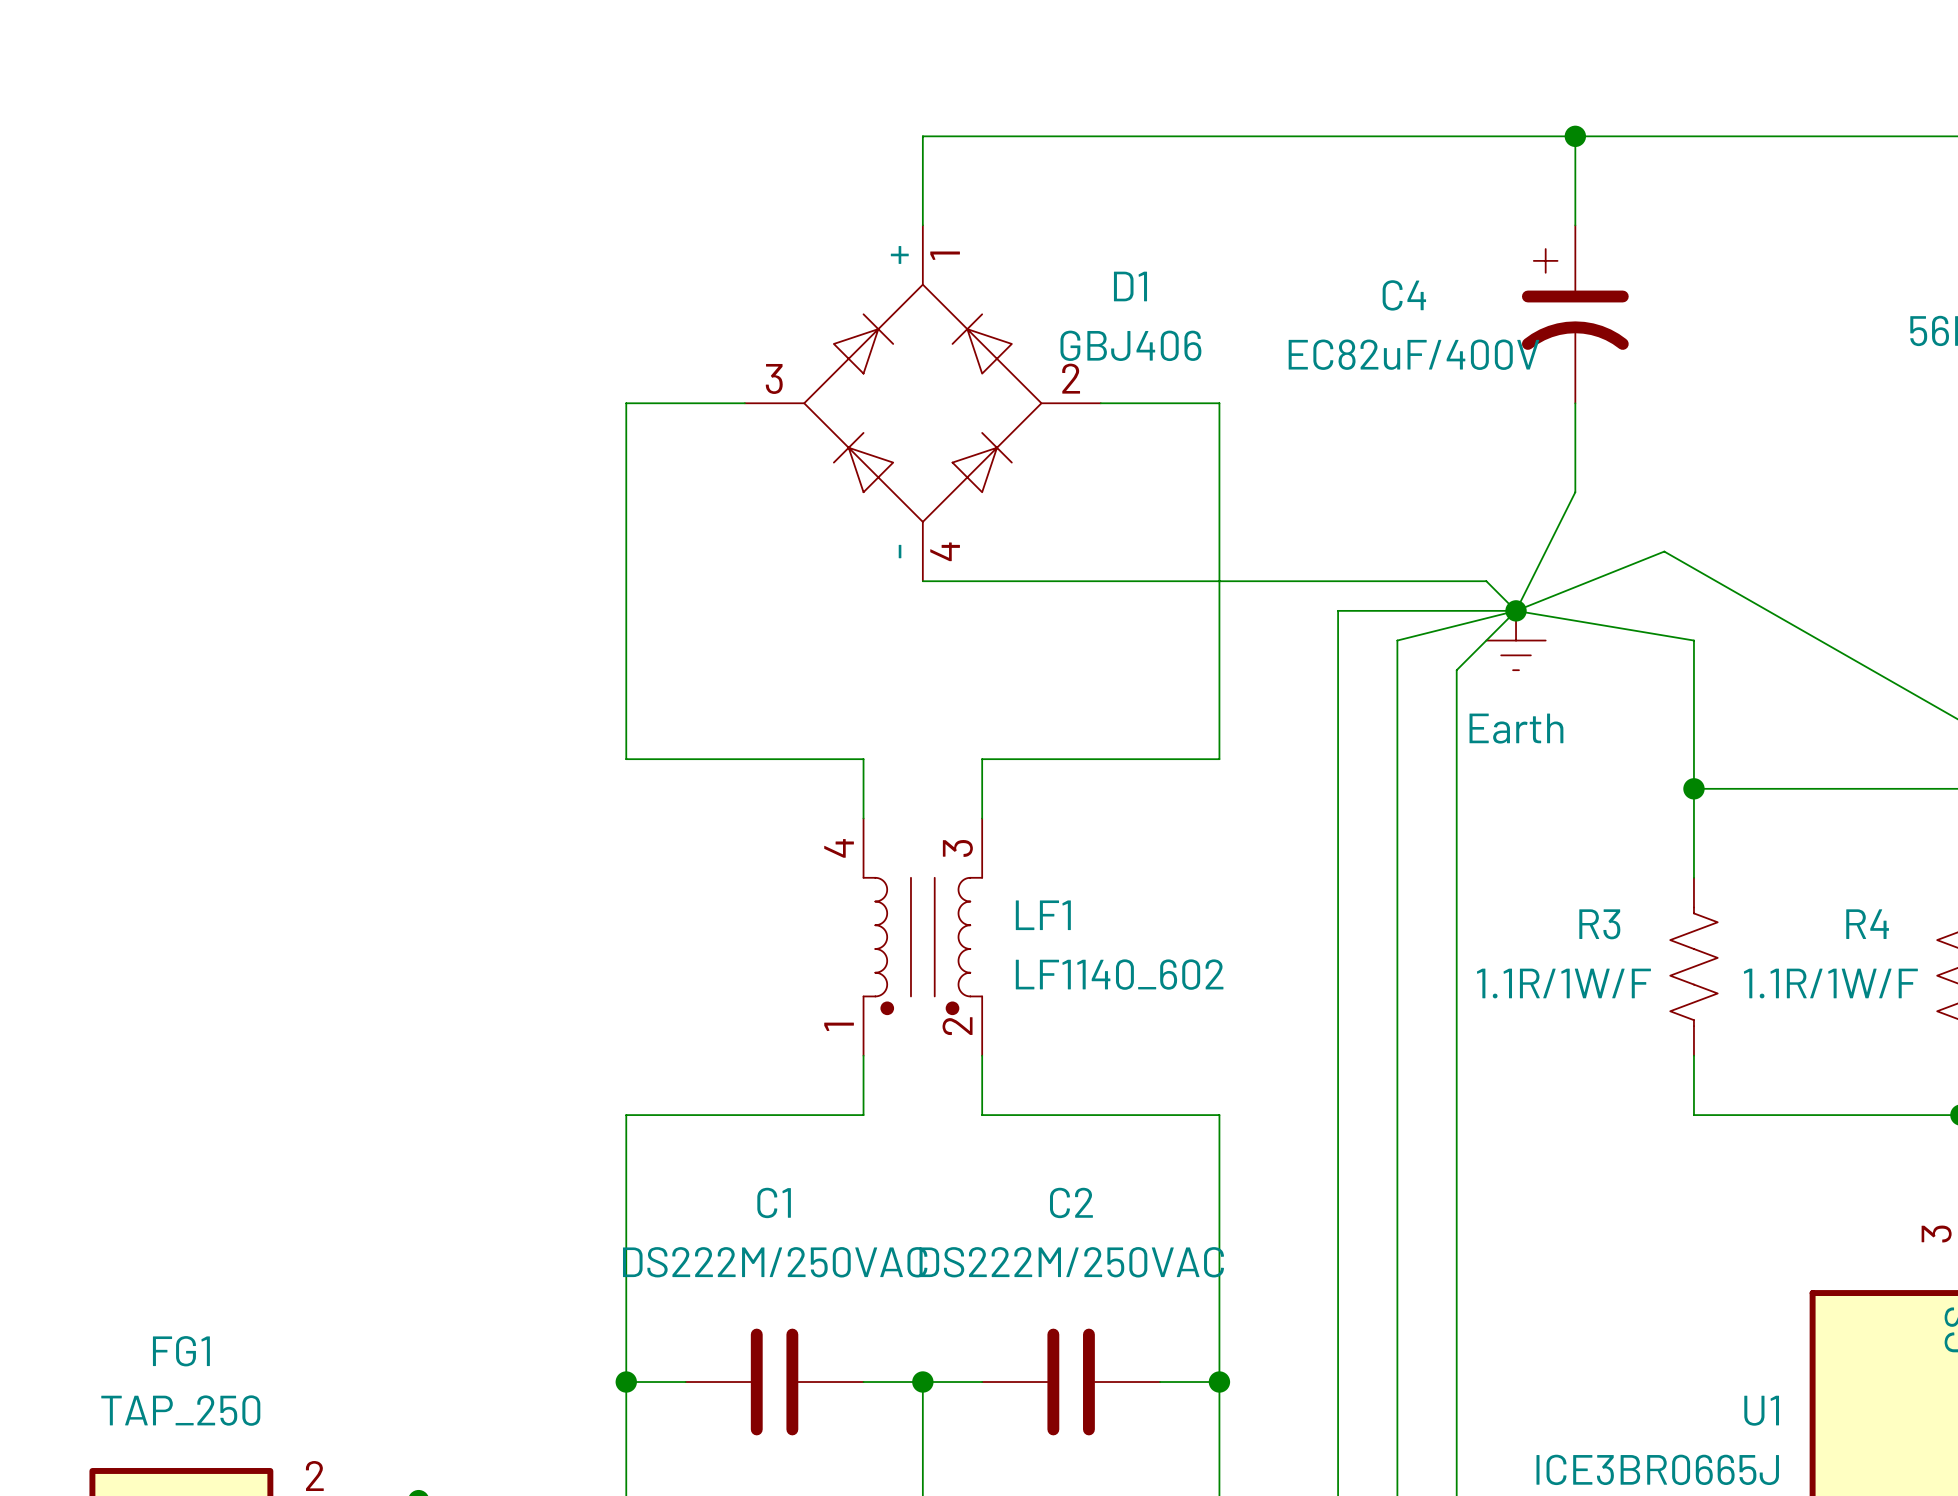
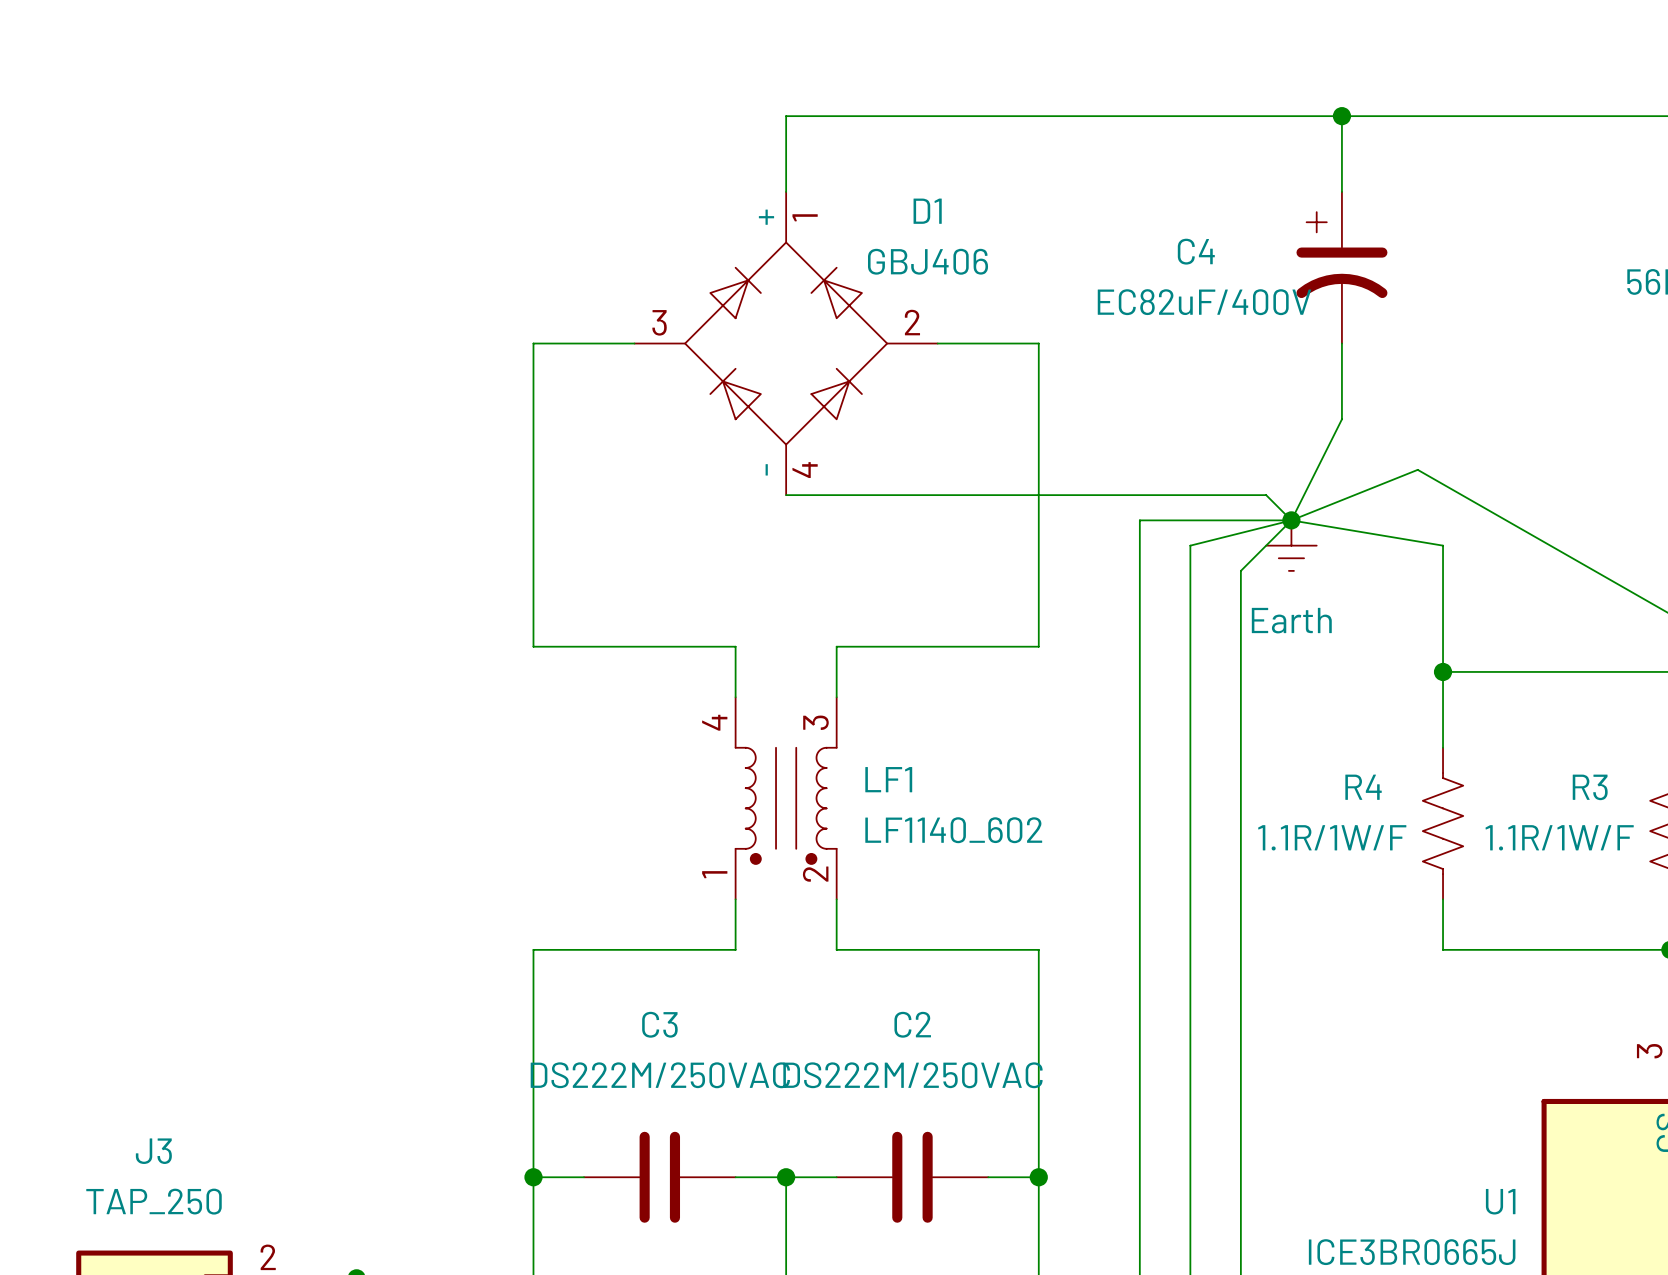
D1 name position: D1 (1130, 286) -> D1 (927, 211)
D1 value position: GBJ406 (1130, 345) -> GBJ406 (928, 261)
R3 name: R3 (1599, 924) -> R4 (1363, 787)
R4 name: R4 (1867, 924) -> R3 (1590, 787)
C1 name: C1 (774, 1202) -> C3 (659, 1024)
FG1 name: FG1 (181, 1351) -> J3 (153, 1151)

